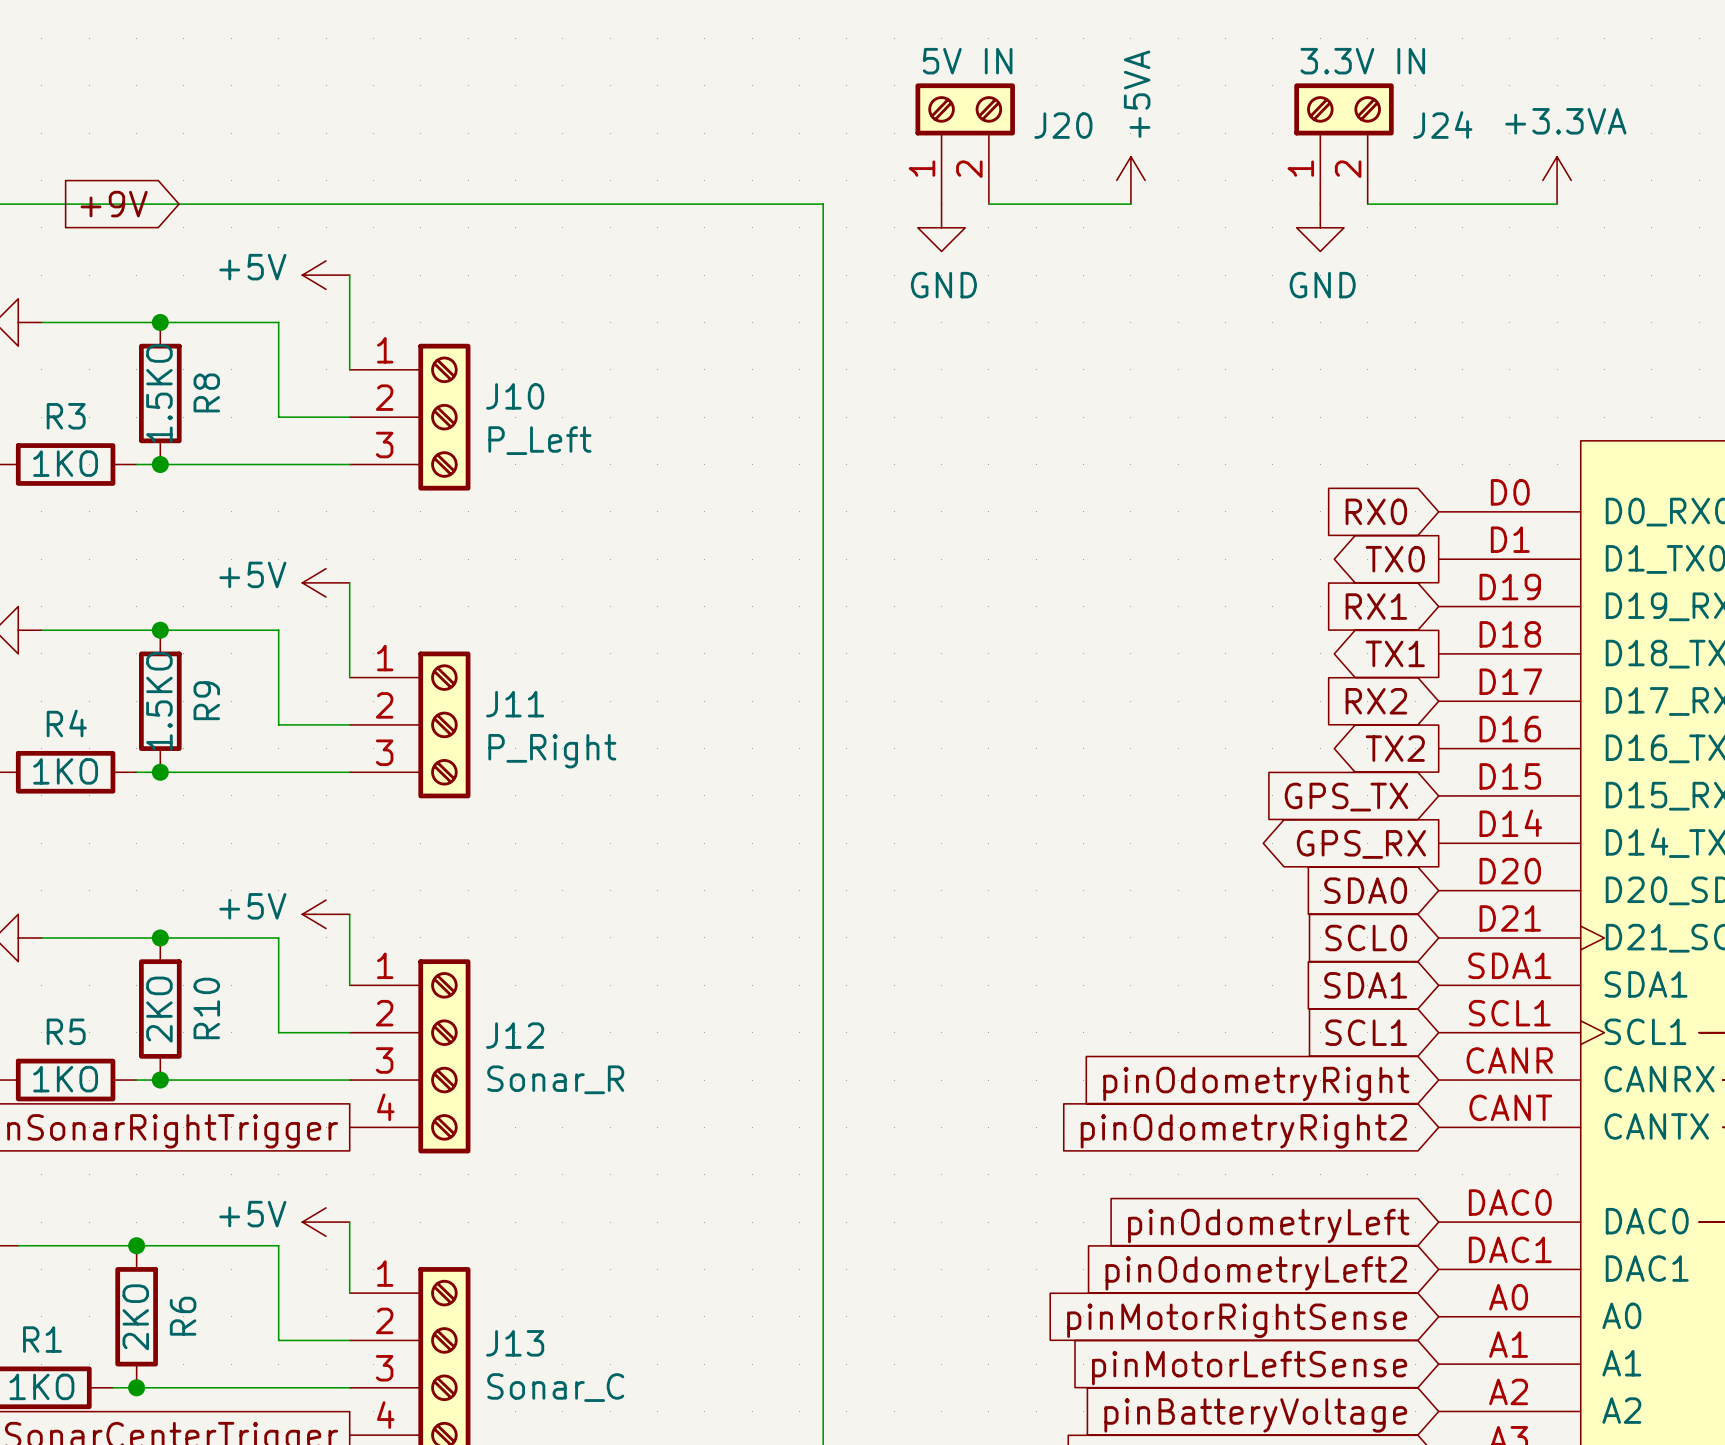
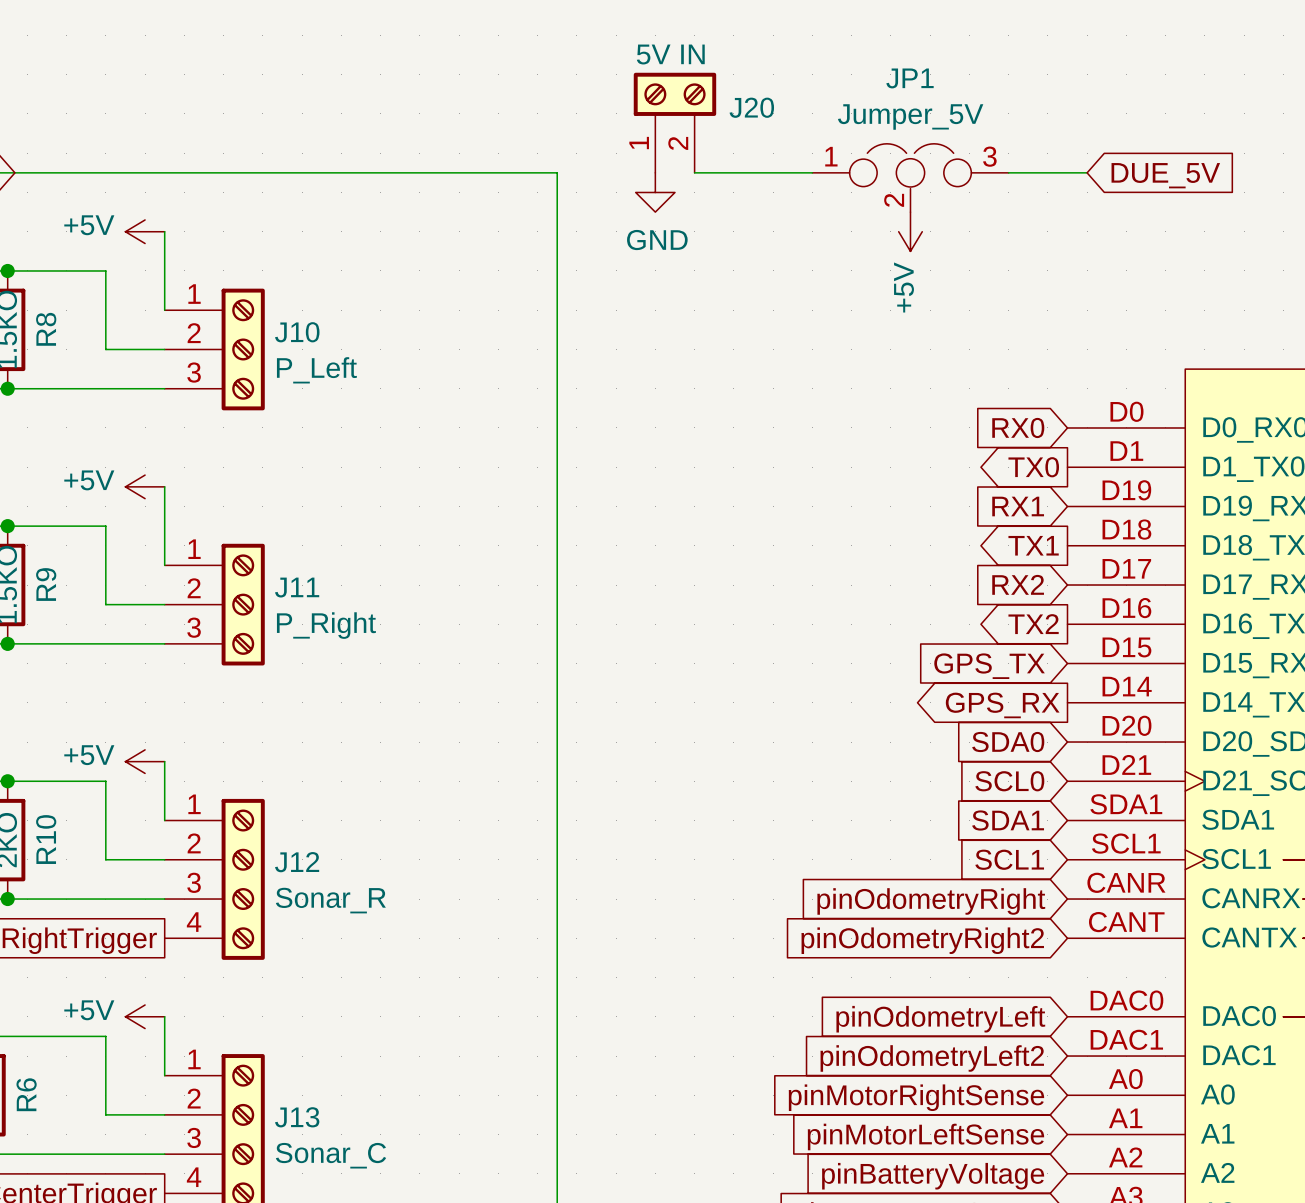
J24: 3.3V IN (1344, 143) -> none
power symbol: +5VA (1130, 180) -> none
power symbol: +3.3VA (1557, 180) -> none
wire: (1462, 204) (1557, 204) -> none
global label: none -> DUE_5V (1165, 175)
JP1: none -> Jumper_5V (910, 177)
power symbol: GND (1320, 227) -> none
power symbol: none -> +5V (910, 231)

